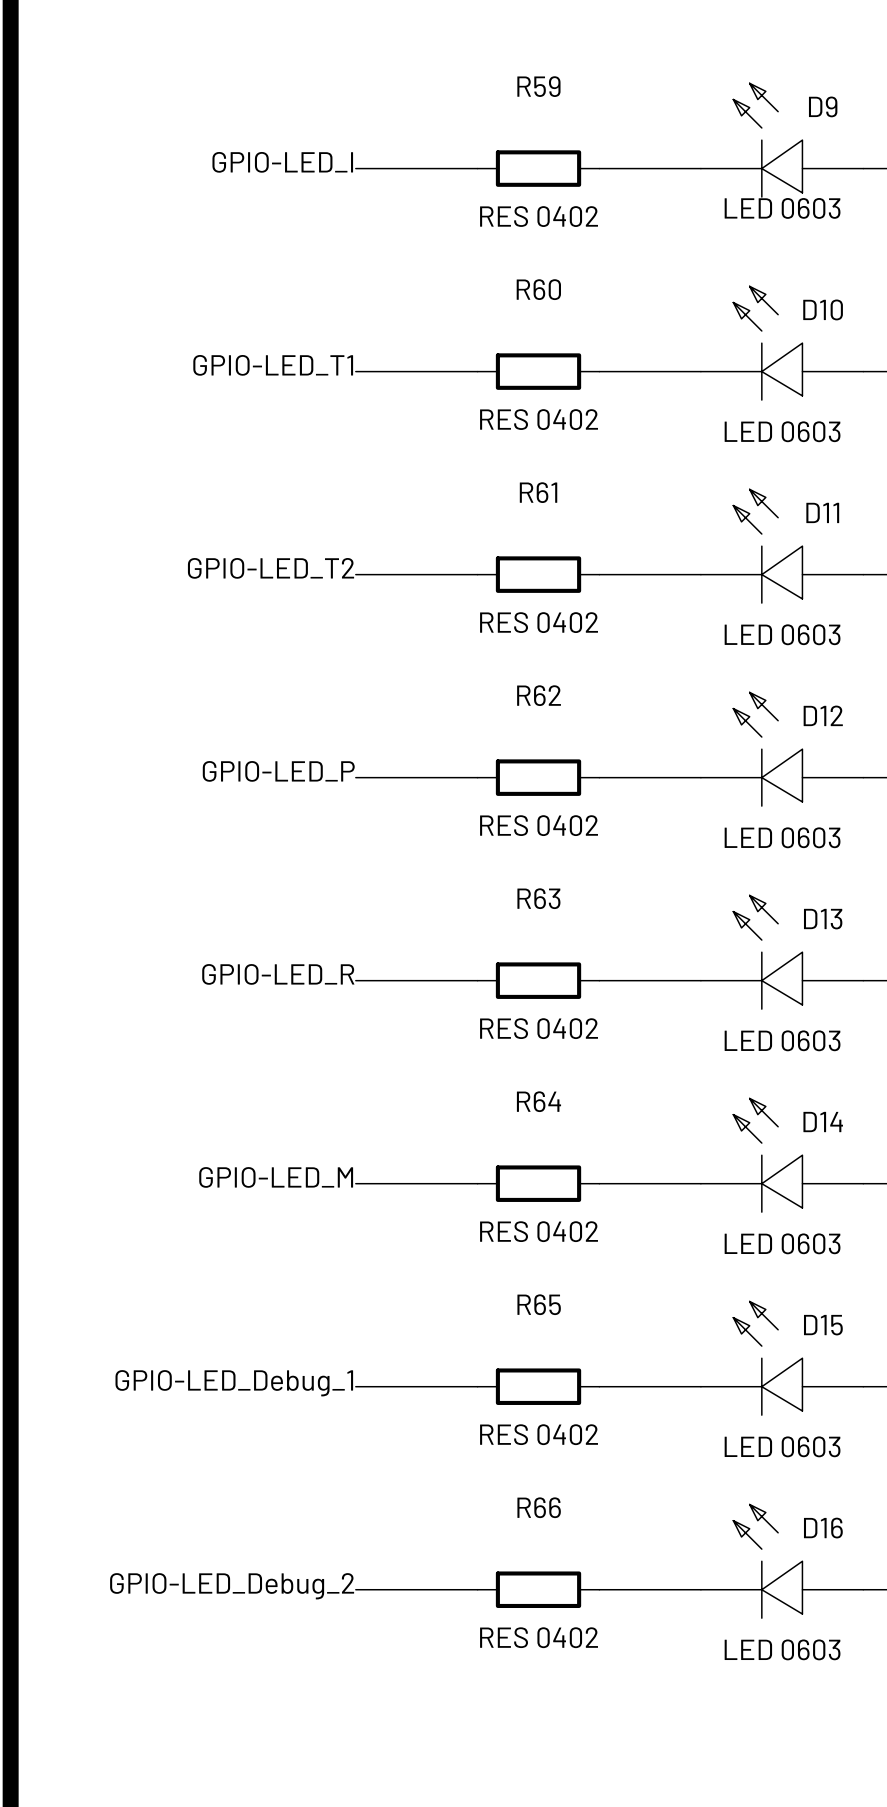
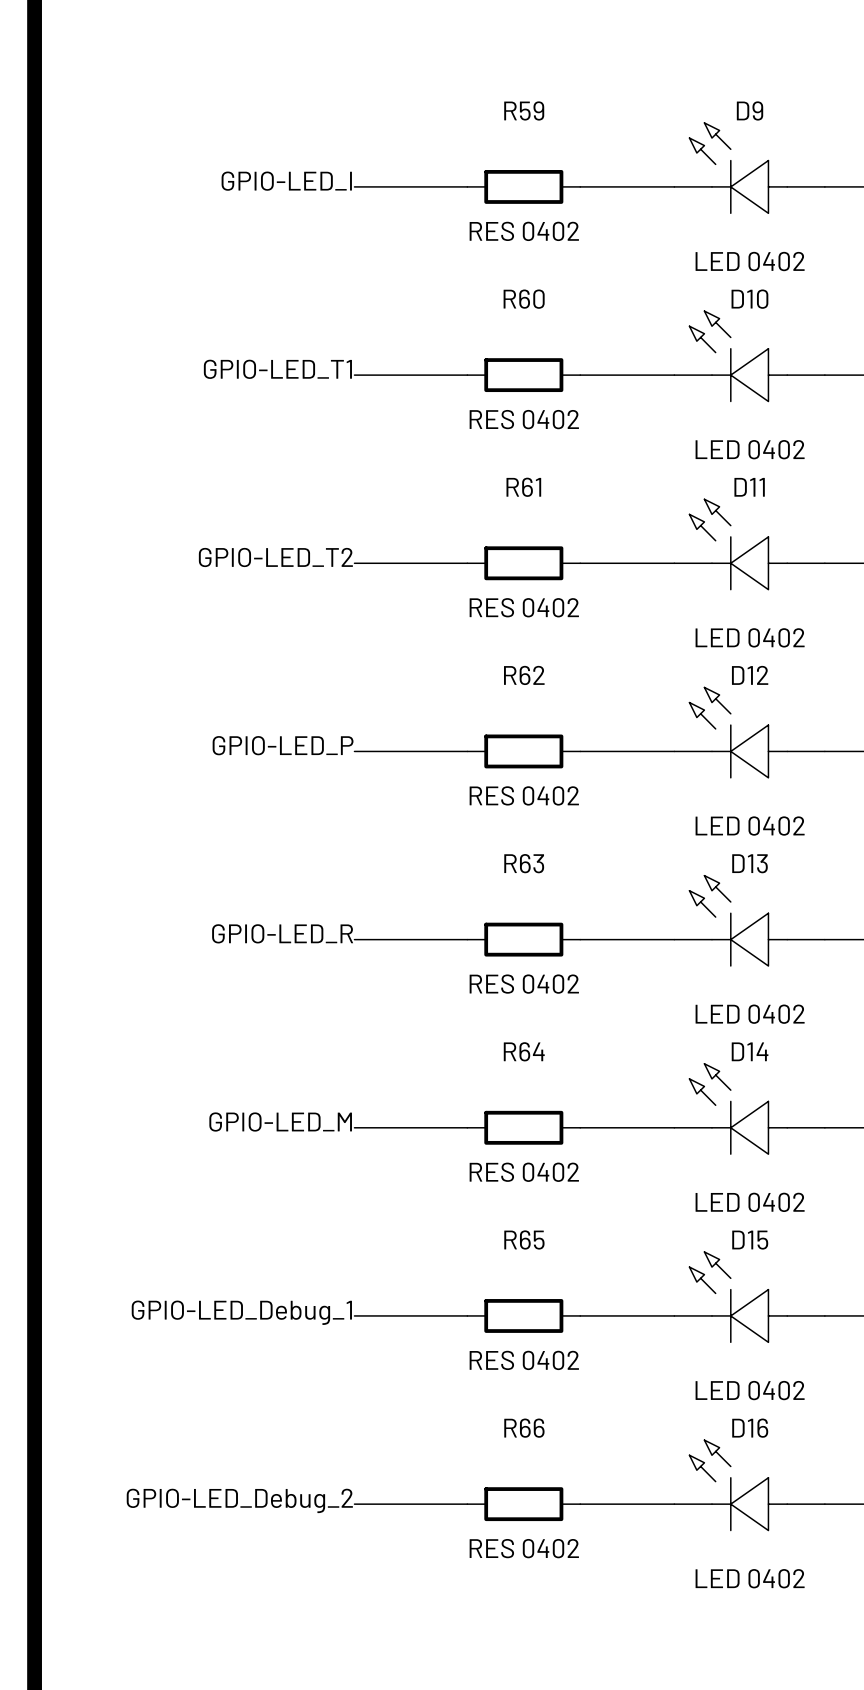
D9 symbol: [700, 83, 864, 198] -> [674, 122, 825, 214]
D9 name position: D9 (823, 106) -> D9 (750, 110)
D9 value: LED 0603 (782, 208) -> LED 0402 (750, 261)
D10 symbol: [700, 286, 864, 401] -> [674, 311, 825, 402]
D10 name position: D10 (823, 309) -> D10 (749, 299)
D10 value: LED 0603 (782, 431) -> LED 0402 (750, 449)
D11 symbol: [700, 489, 864, 604] -> [674, 499, 825, 590]
D11 name position: D11 (822, 512) -> D11 (749, 487)
D11 value: LED 0603 (782, 634) -> LED 0402 (750, 637)
D12 symbol: [700, 692, 864, 807] -> [674, 687, 825, 778]
D12 name position: D12 (823, 715) -> D12 (750, 675)
D12 value: LED 0603 (782, 837) -> LED 0402 (750, 826)
D13 symbol: [700, 895, 864, 1010] -> [674, 875, 825, 967]
D13 name position: D13 (823, 919) -> D13 (750, 863)
D13 value: LED 0603 (782, 1040) -> LED 0402 (750, 1014)
D14 symbol: [700, 1098, 864, 1213] -> [674, 1063, 825, 1155]
D14 name position: D14 (823, 1122) -> D14 (750, 1051)
D14 value: LED 0603 (782, 1243) -> LED 0402 (750, 1202)
D15 symbol: [700, 1301, 864, 1416] -> [674, 1251, 825, 1343]
D15 name position: D15 (823, 1325) -> D15 (750, 1240)
D15 value: LED 0603 (782, 1446) -> LED 0402 (750, 1390)
D16 symbol: [700, 1504, 864, 1619] -> [674, 1440, 825, 1531]
D16 name position: D16 (823, 1528) -> D16 (750, 1428)
D16 value: LED 0603 (782, 1649) -> LED 0402 (750, 1578)

